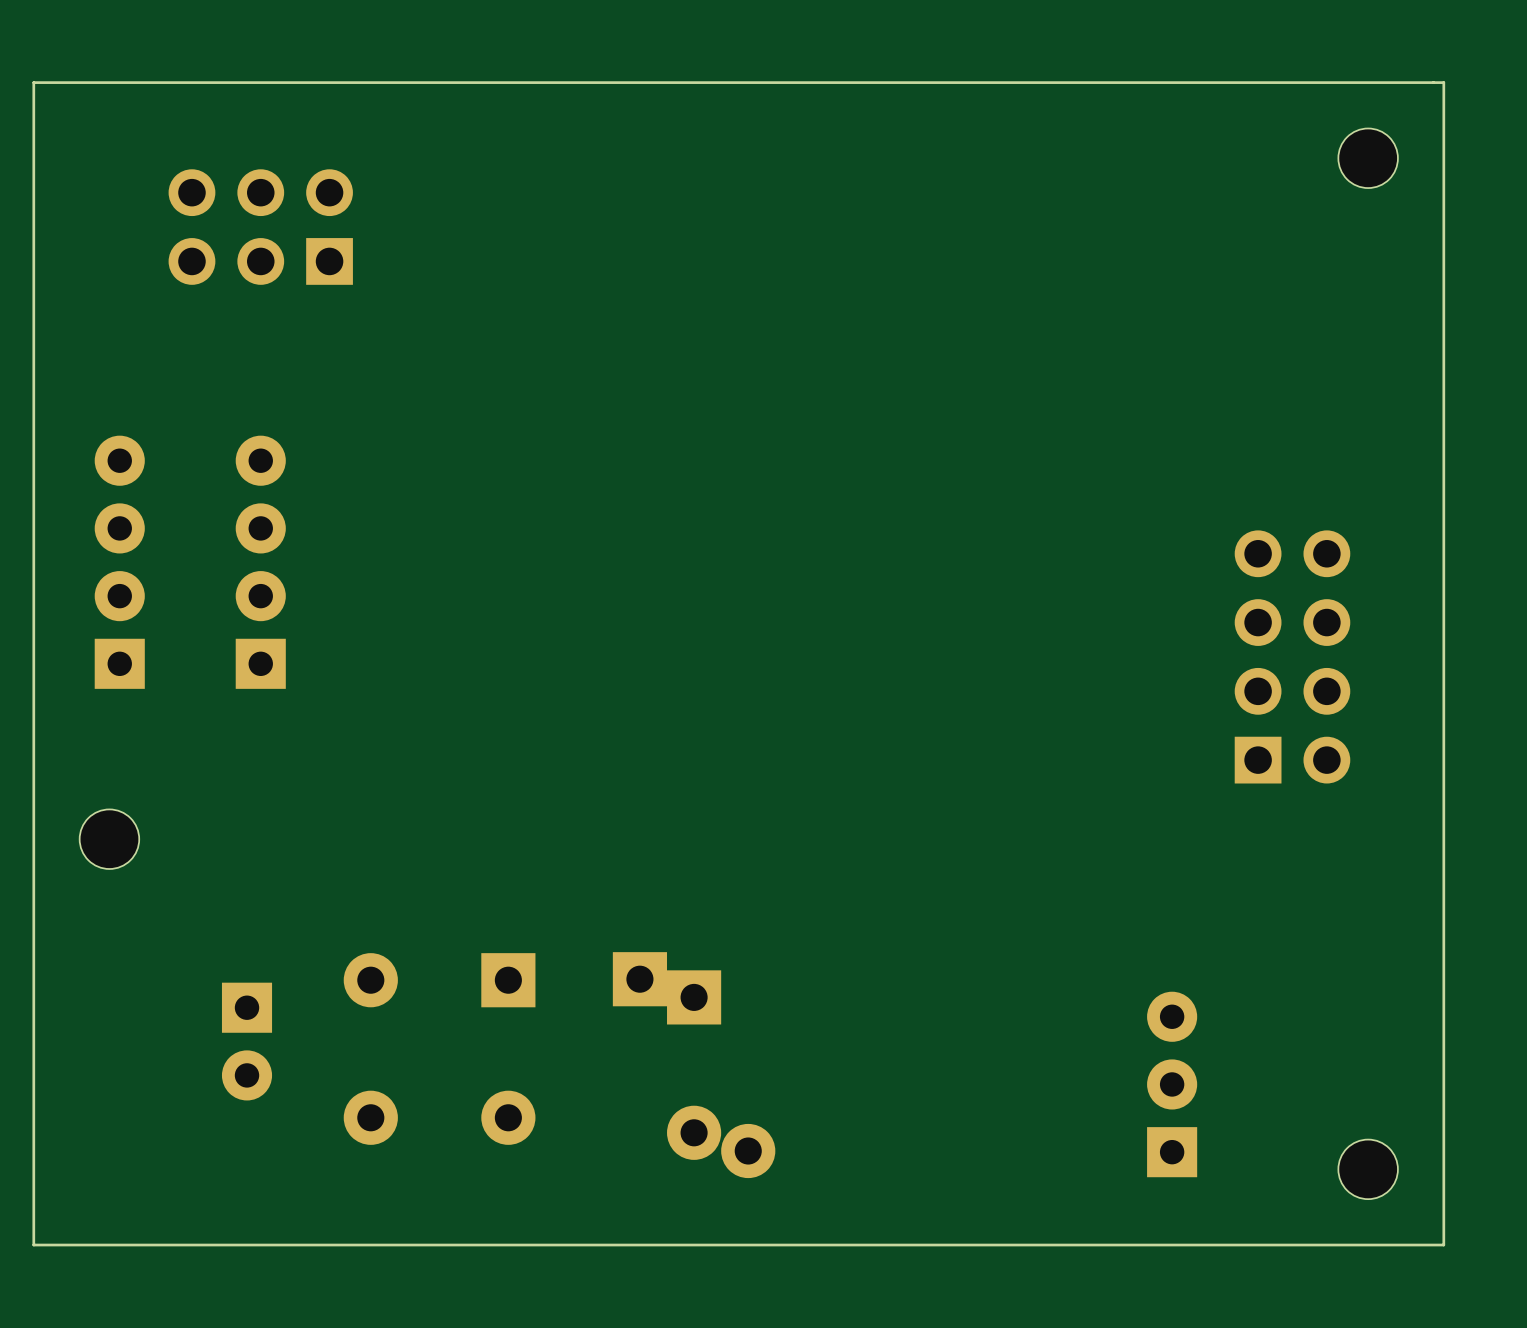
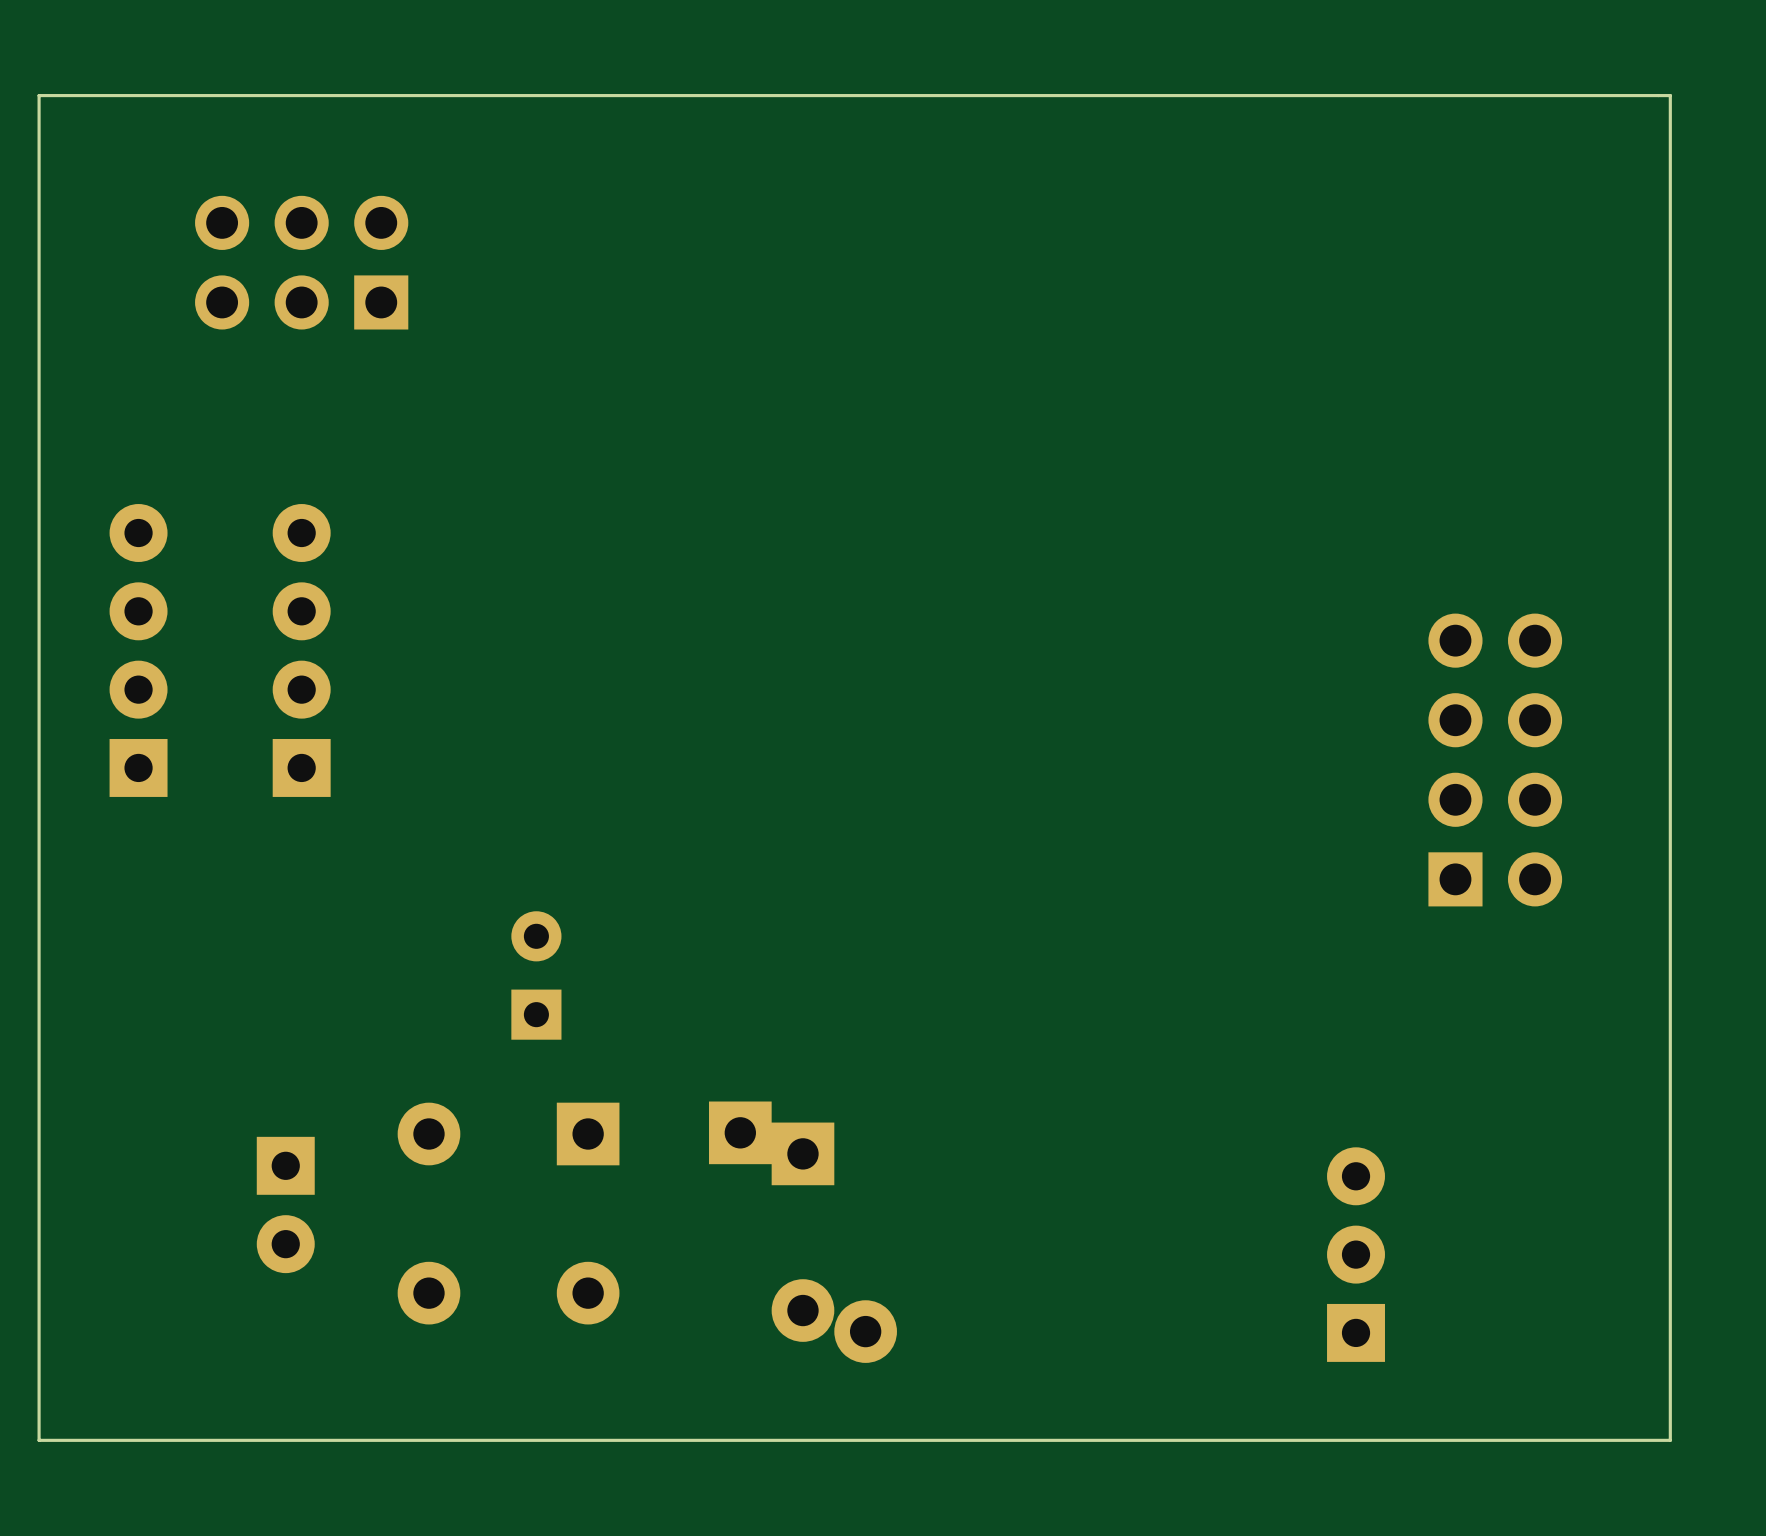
part: (1368, 158) -> none
part: (109, 839) -> none
part: none -> (536, 975)
part: (1368, 1169) -> none

